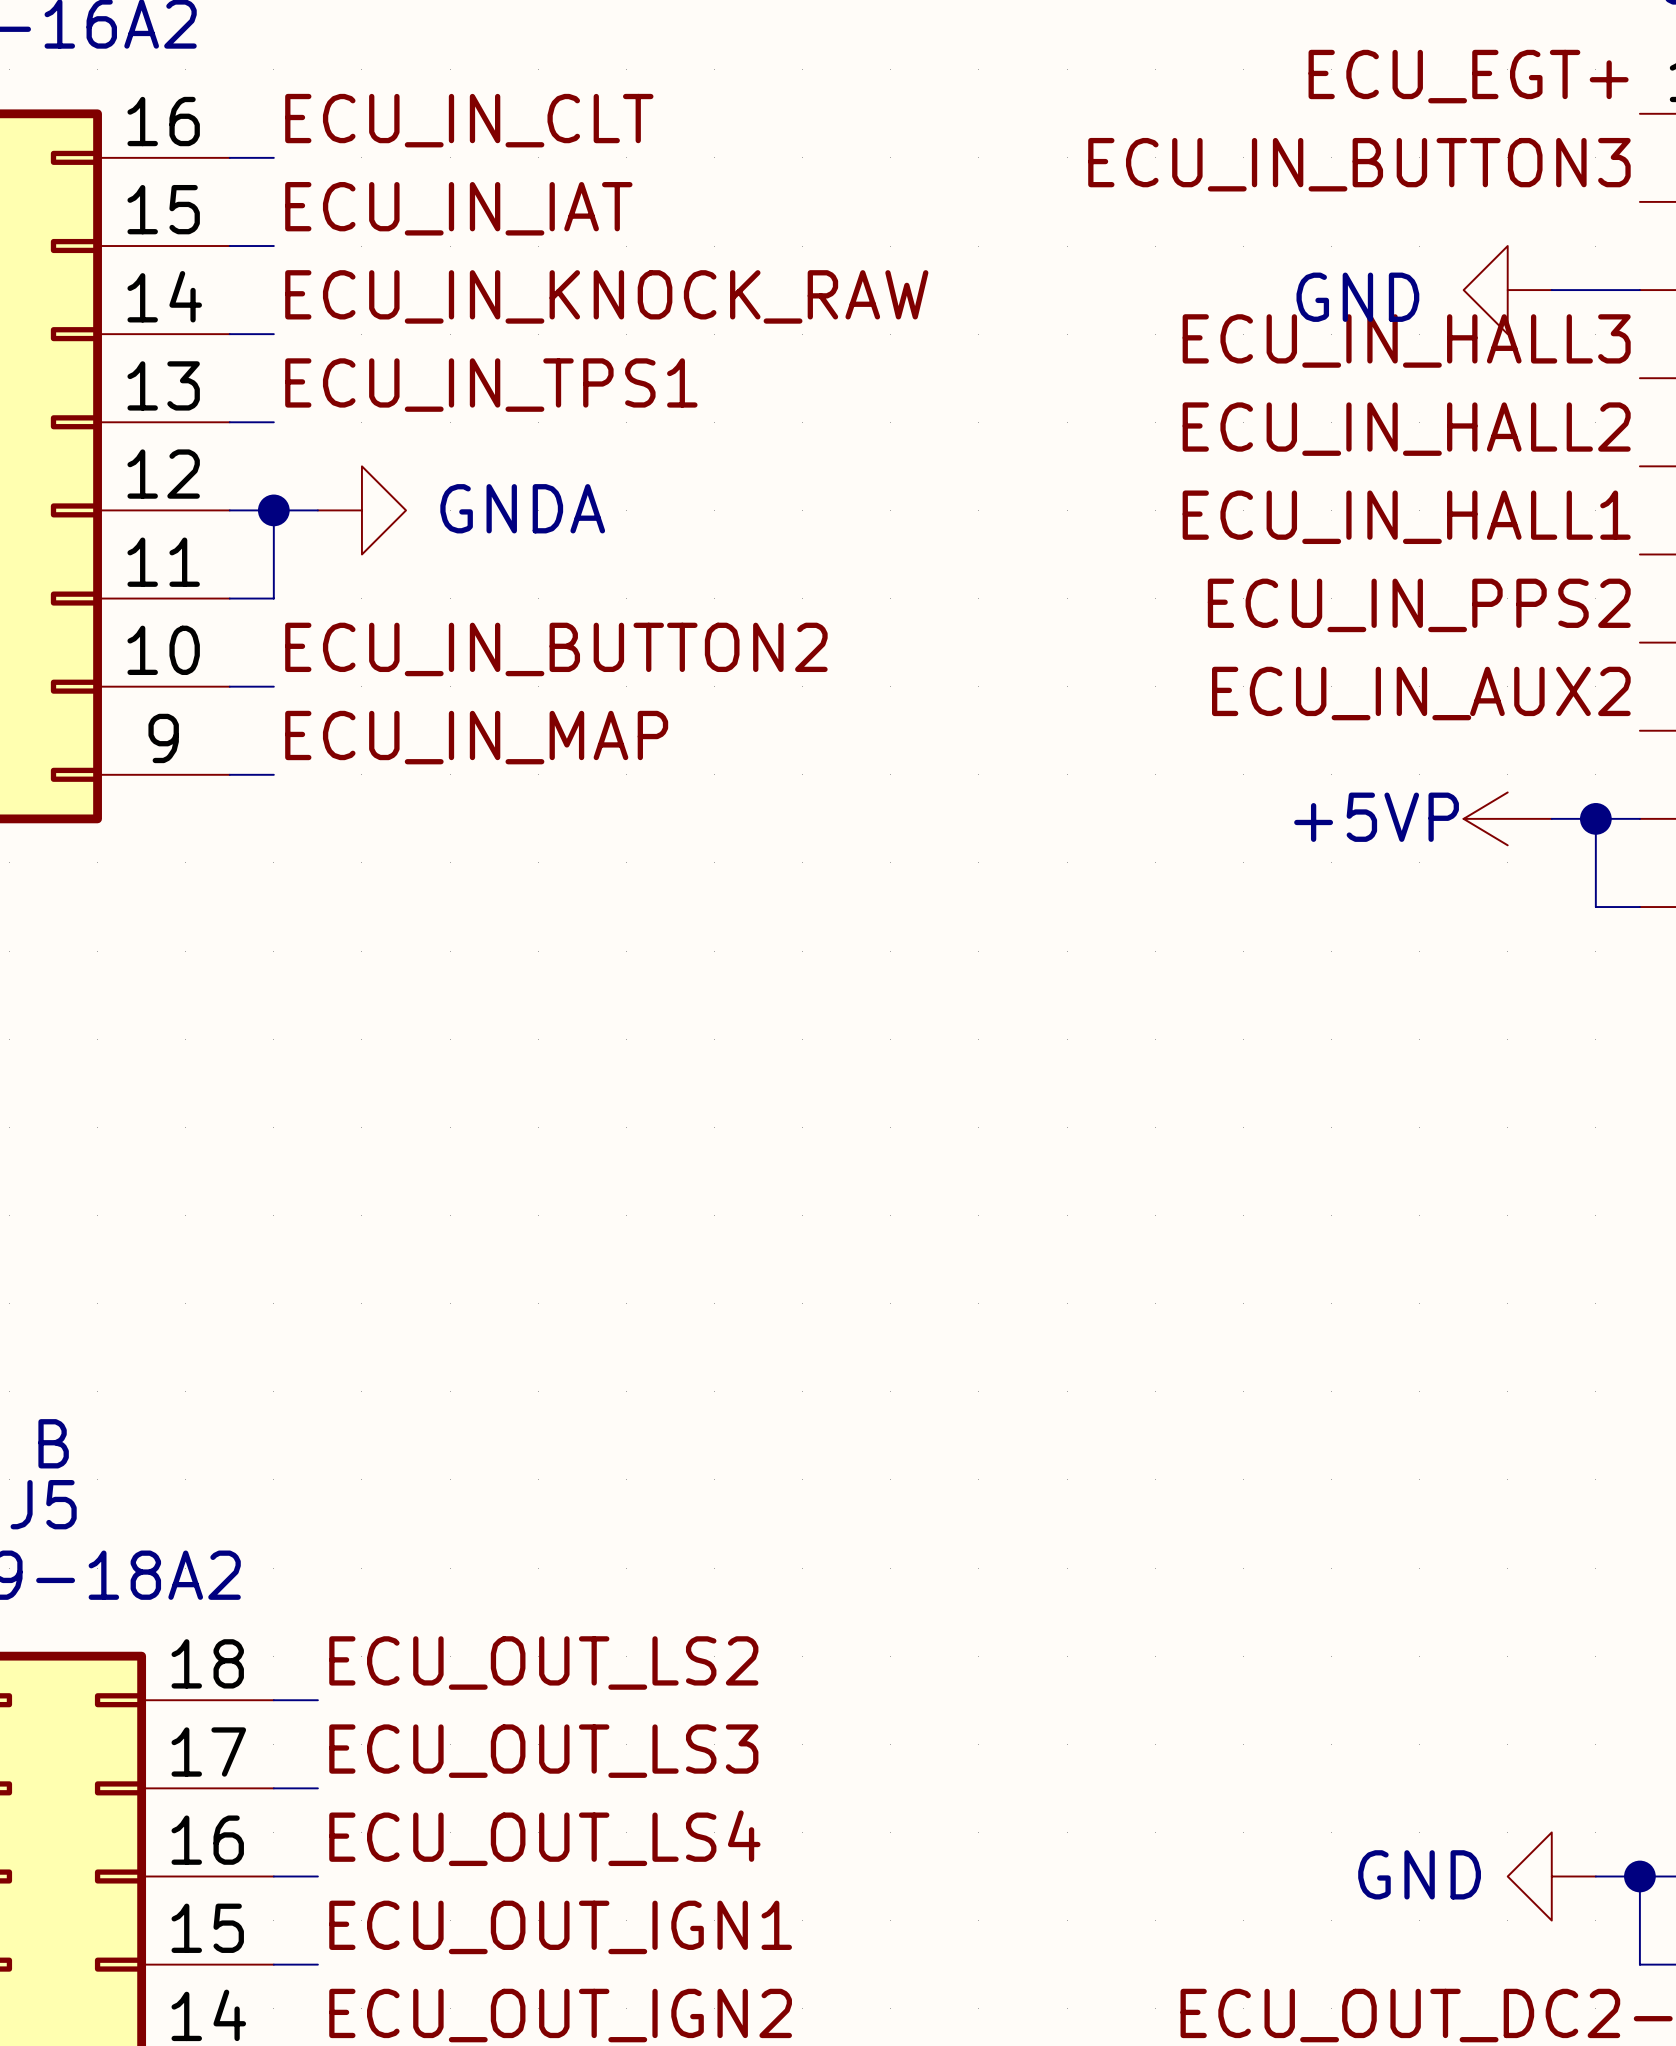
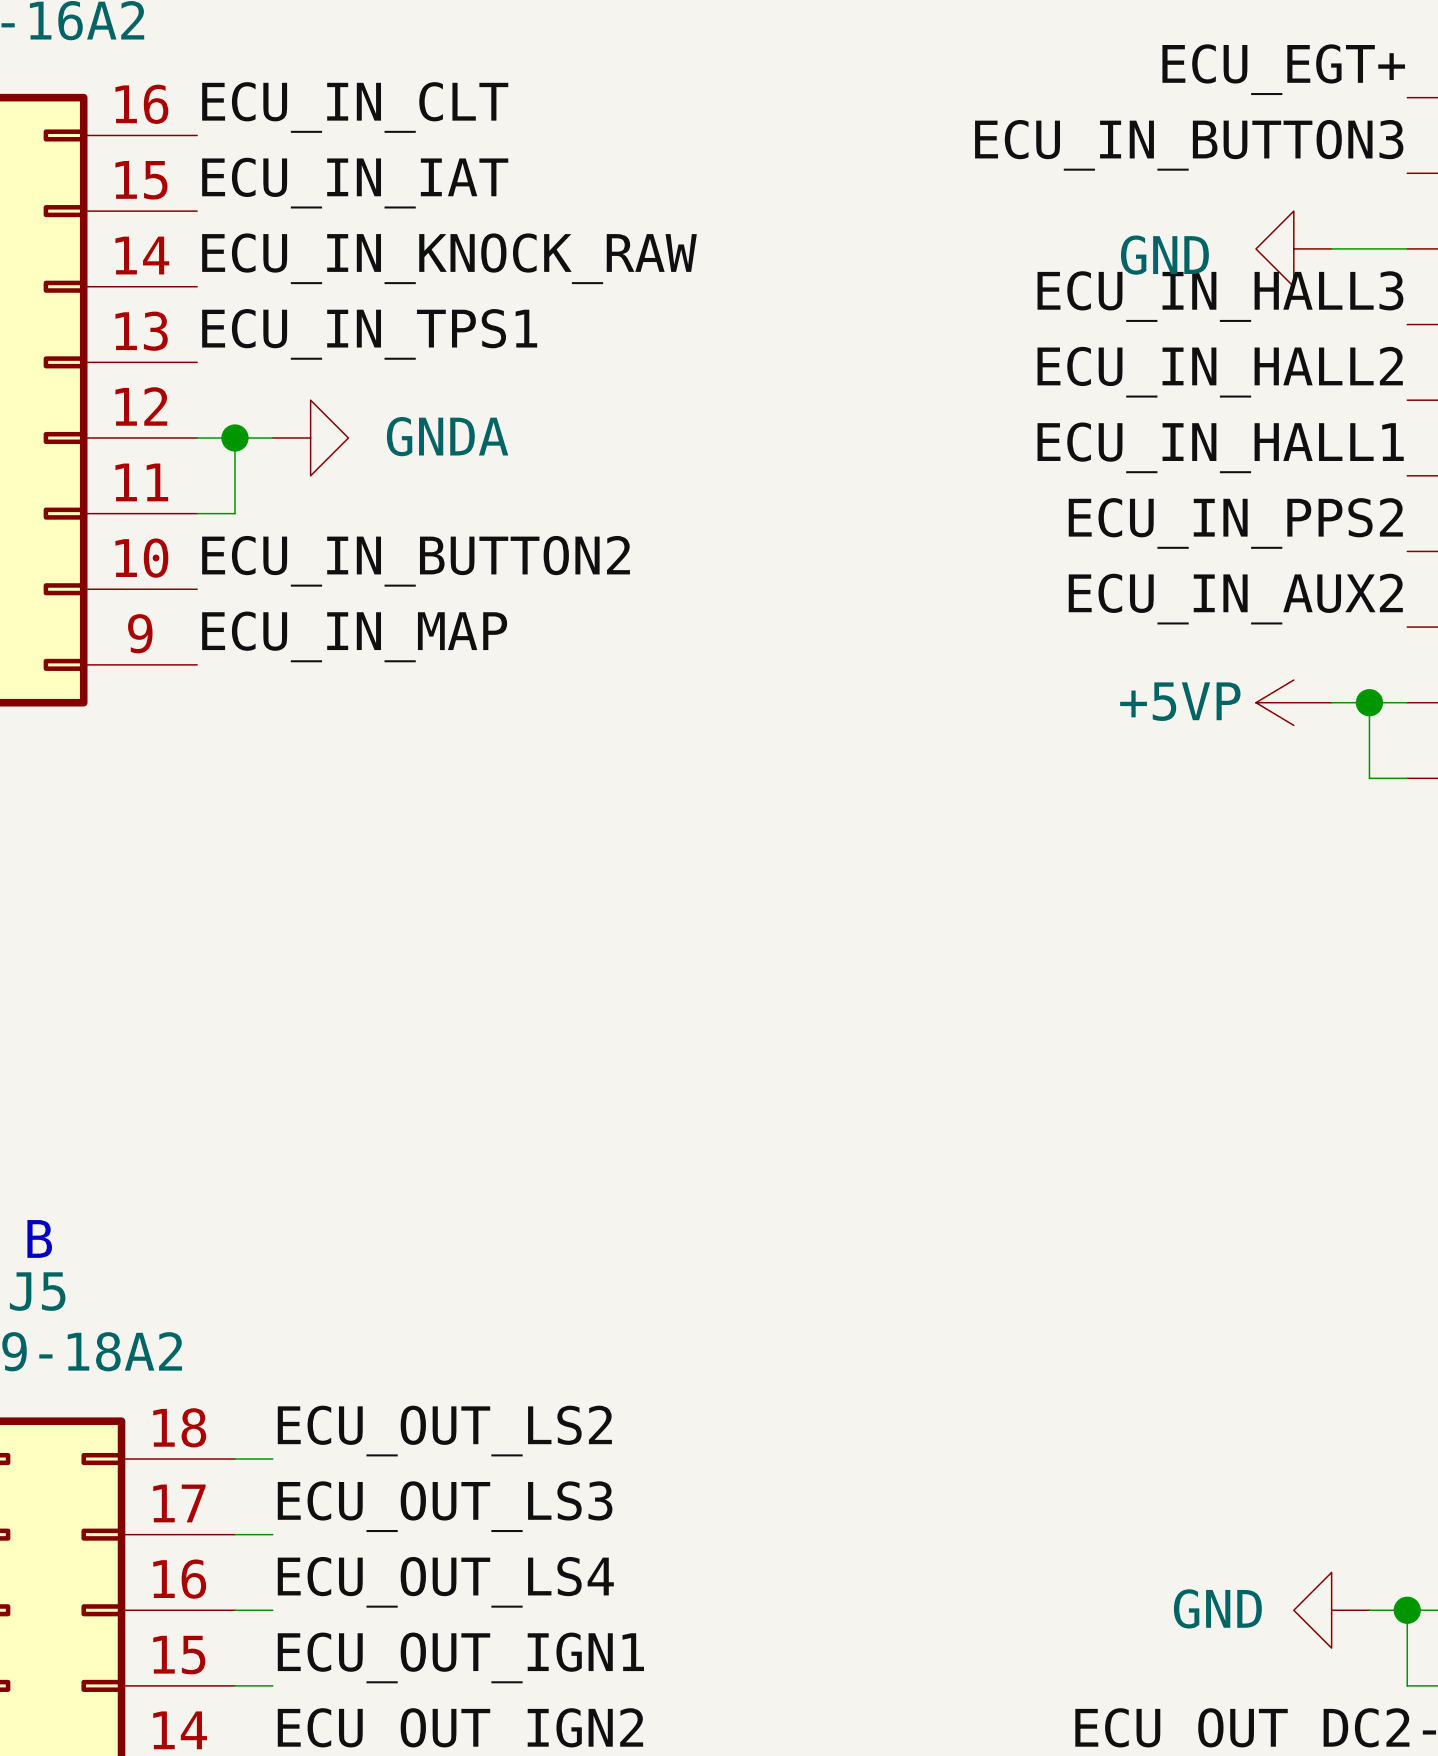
label position: ECU_IN_CLT (469, 120) -> ECU_IN_CLT (355, 107)
wire: (229, 157) (273, 157) -> none
label position: ECU_IN_IAT (458, 208) -> ECU_IN_IAT (355, 183)
wire: (229, 246) (273, 246) -> none
label position: ECU_IN_KNOCK_RAW (606, 296) -> ECU_IN_KNOCK_RAW (449, 258)
wire: (229, 334) (273, 334) -> none
label position: ECU_IN_TPS1 (491, 385) -> ECU_IN_TPS1 (369, 334)
wire: (229, 422) (273, 422) -> none
label position: ECU_IN_BUTTON2 (556, 649) -> ECU_IN_BUTTON2 (416, 561)
wire: (229, 686) (273, 686) -> none
label position: ECU_IN_MAP (476, 737) -> ECU_IN_MAP (354, 636)
wire: (229, 774) (273, 774) -> none

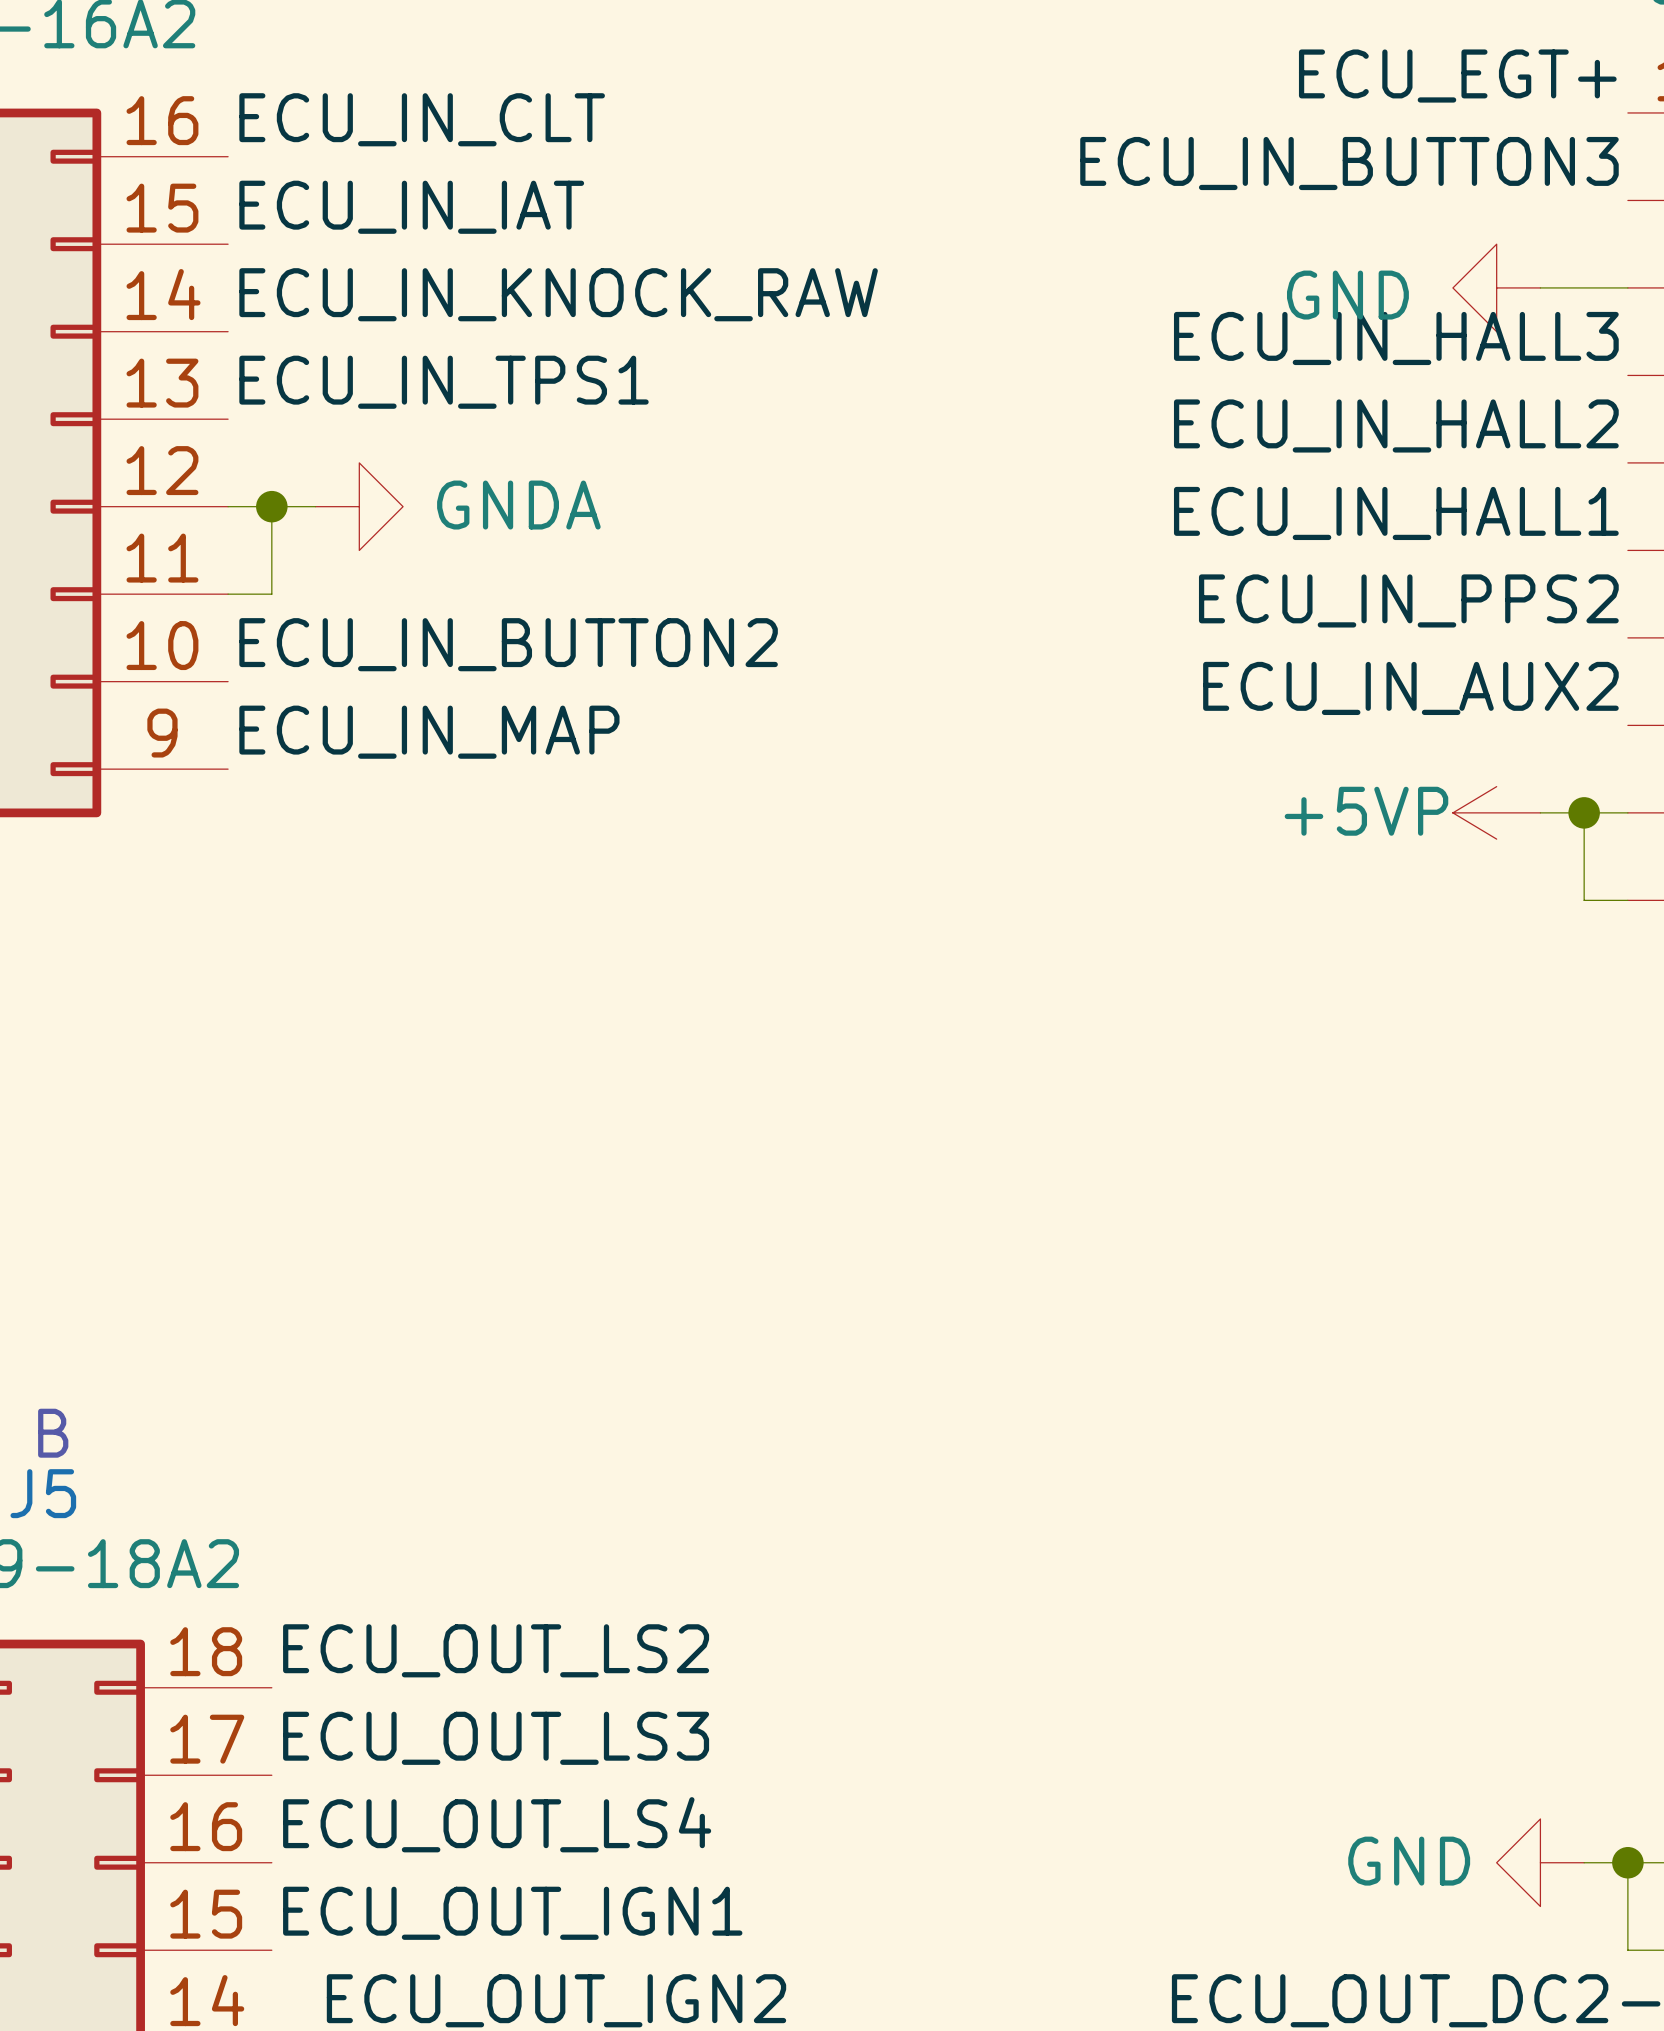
label position: ECU_OUT_LS2 (444, 1431) -> ECU_OUT_LS2 (496, 1650)
wire: (234, 1459) (272, 1459) -> none
label position: ECU_OUT_LS3 (445, 1506) -> ECU_OUT_LS3 (496, 1738)
wire: (234, 1534) (272, 1534) -> none
label position: ECU_OUT_LS4 (445, 1582) -> ECU_OUT_LS4 (497, 1824)
wire: (234, 1610) (272, 1610) -> none
label position: ECU_OUT_IGN1 (460, 1657) -> ECU_OUT_IGN1 (512, 1913)
wire: (234, 1685) (272, 1685) -> none

